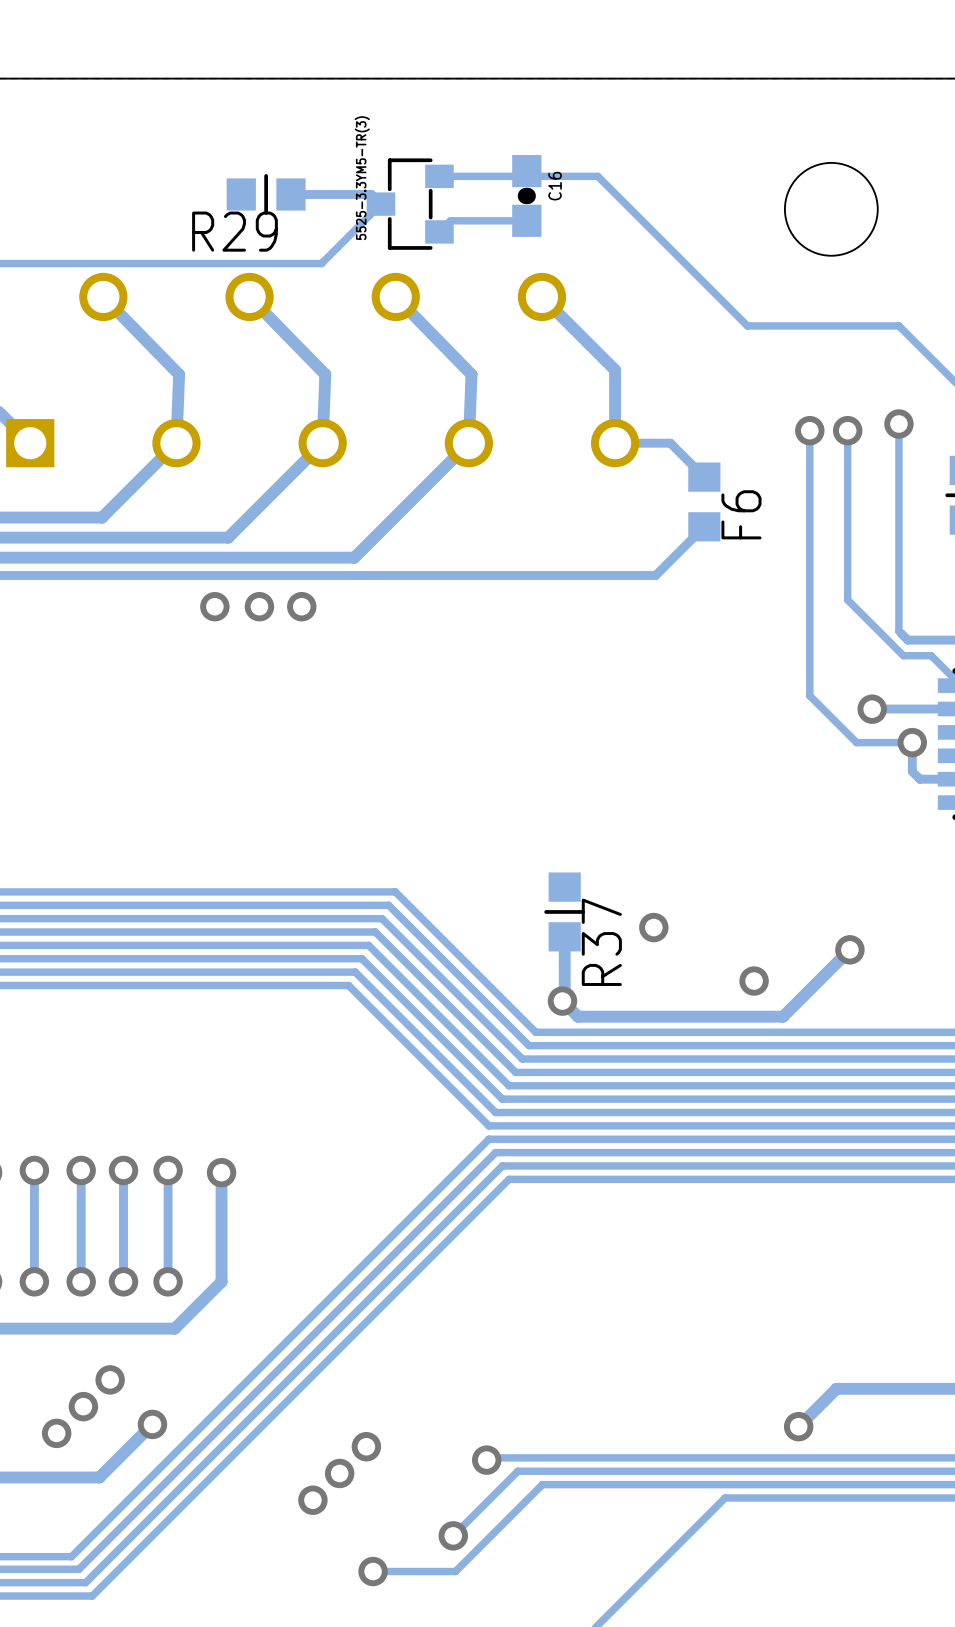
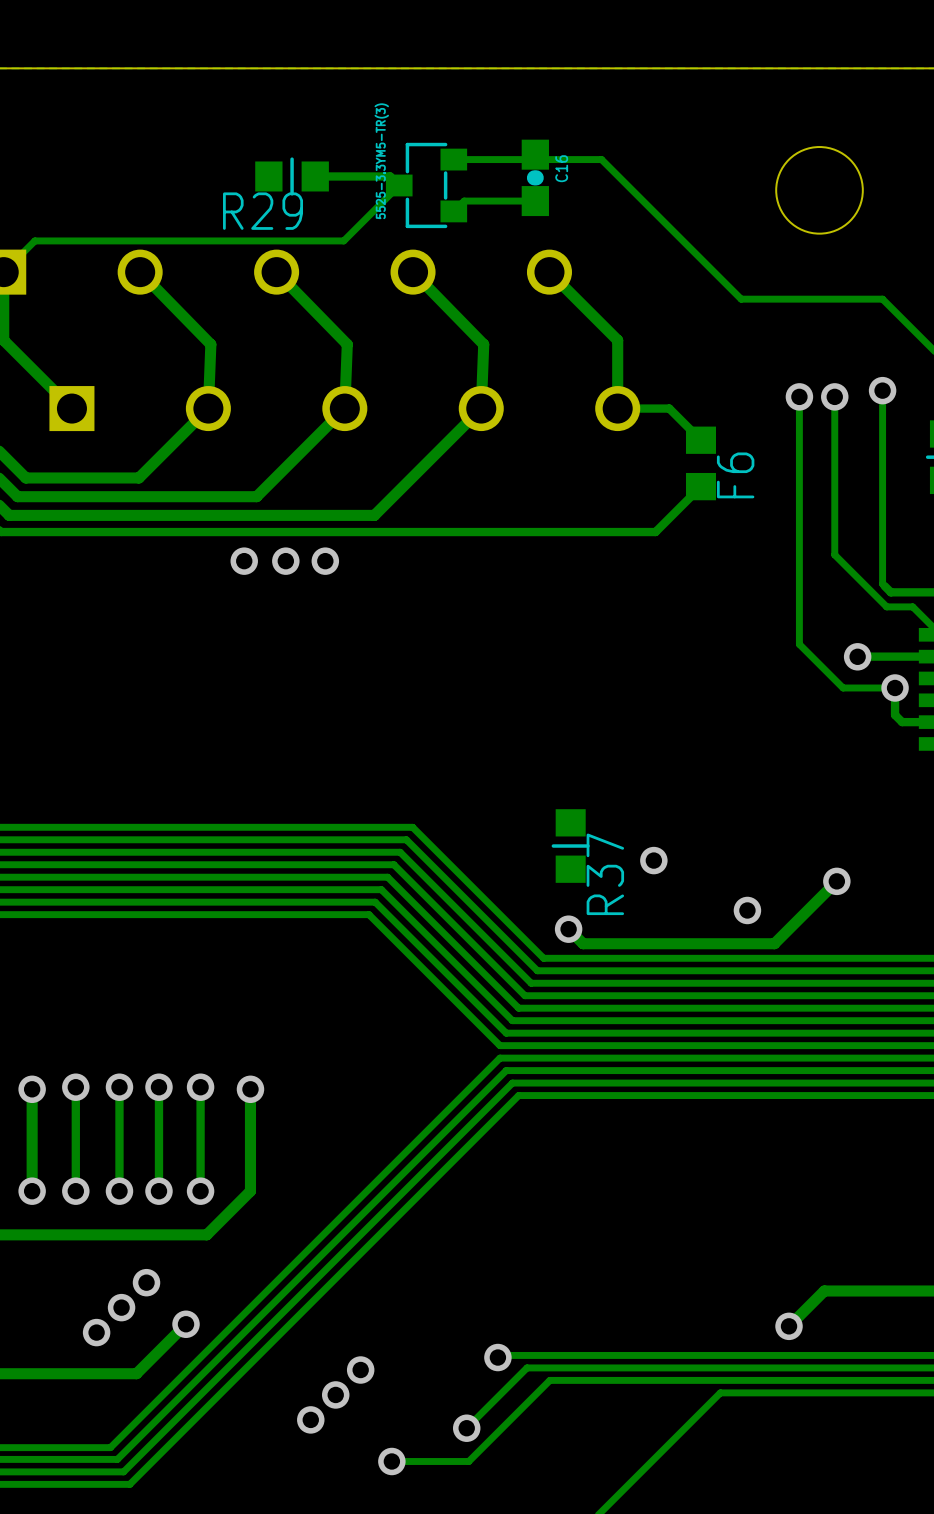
track: (564, 936) (564, 998) (562, 1001) -> none
via position: (366, 1446) -> (310, 1419)

